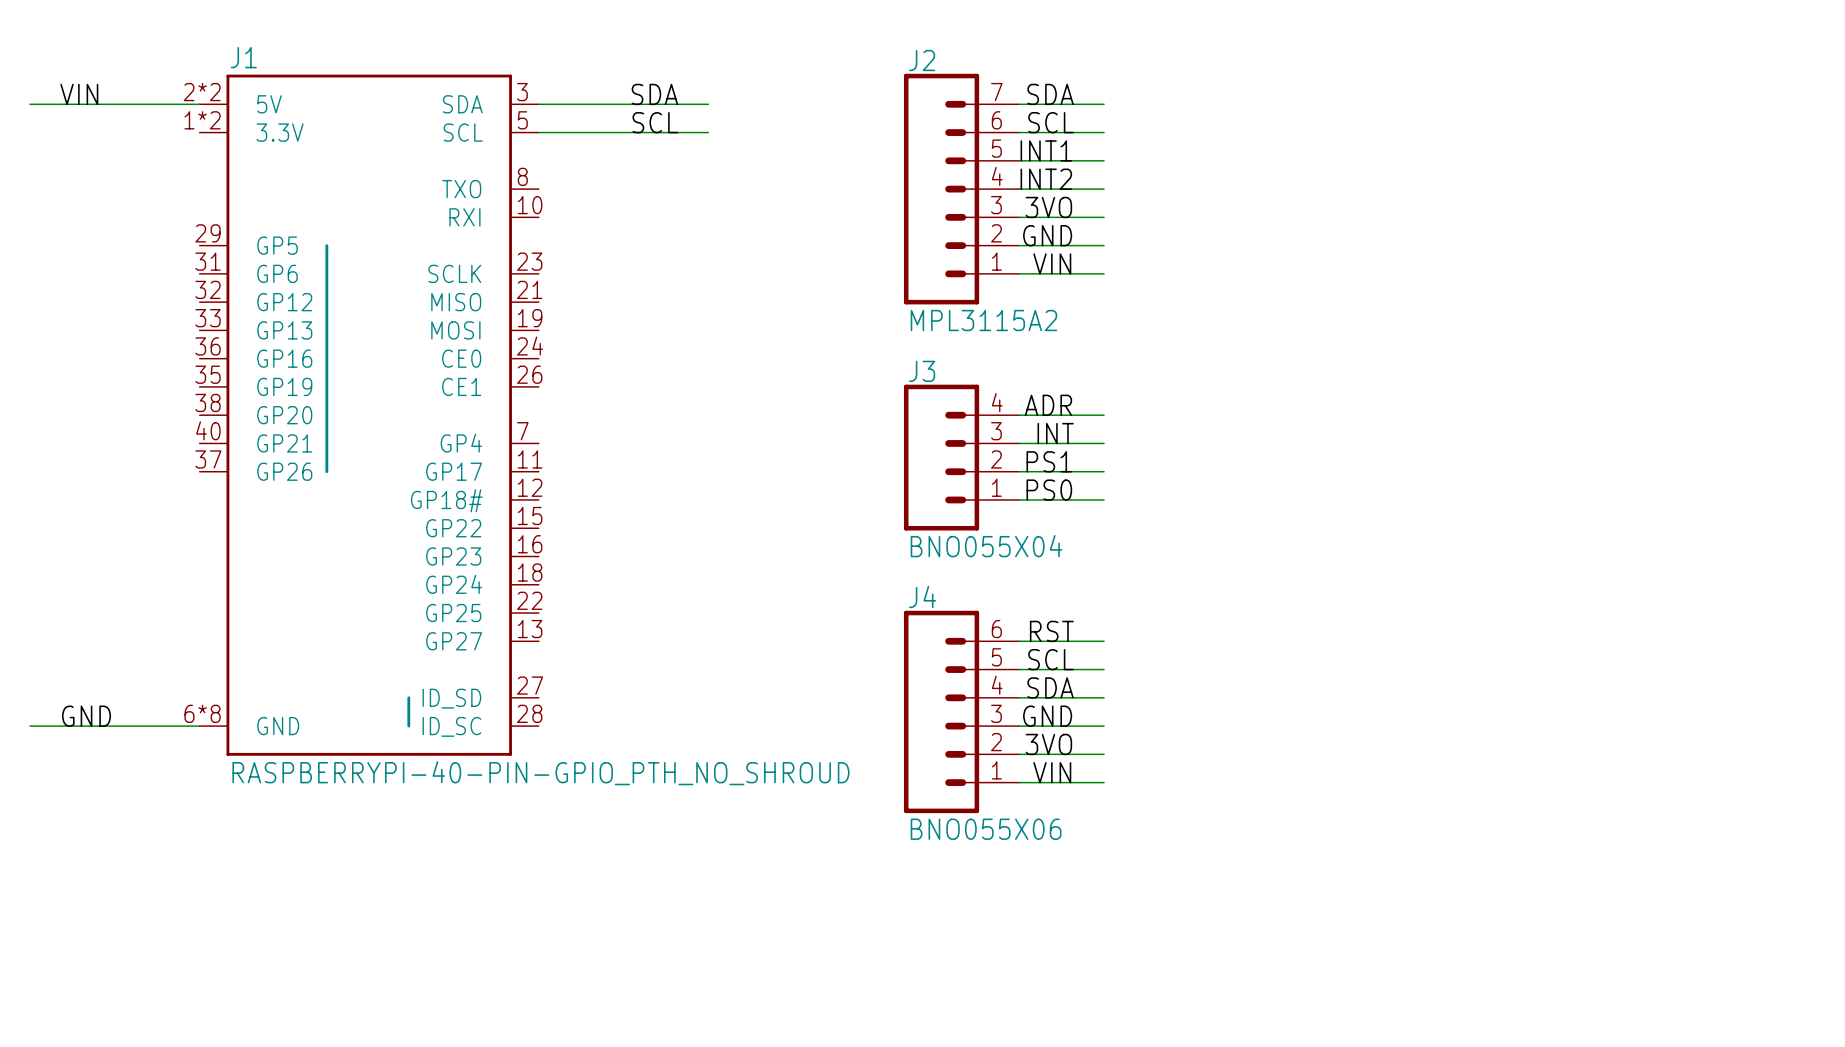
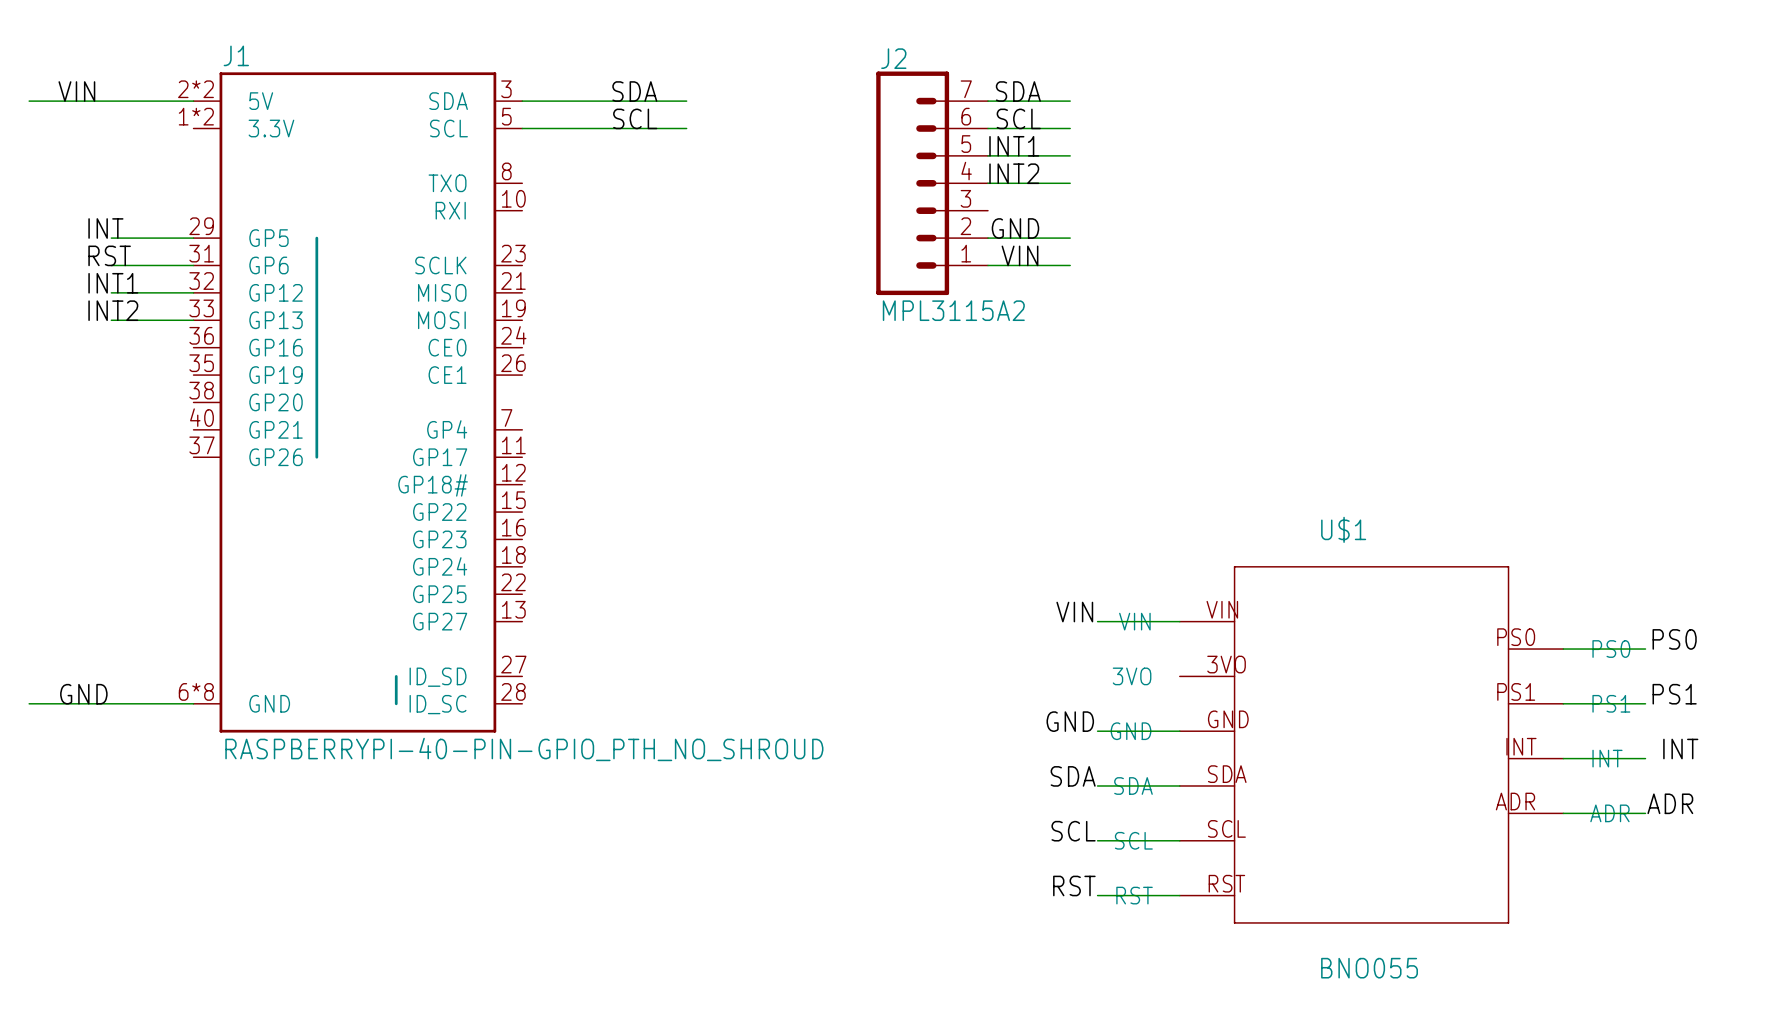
label: 3VO (1048, 207) -> none
wire: (1019, 217) (1104, 217) -> none
label: none -> INT (105, 228)
wire: none -> (111, 238) (193, 238)
label: none -> RST (109, 255)
wire: none -> (111, 265) (193, 265)
label: none -> INT1 (113, 283)
wire: none -> (111, 292) (193, 292)
label: none -> INT2 (113, 310)
wire: none -> (111, 320) (193, 320)
label: ADR (1048, 405) -> none
wire: (1019, 415) (1104, 415) -> none
label: INT (1055, 433) -> none
wire: (1019, 443) (1104, 443) -> none
J3: (961, 457) -> none
label: PS1 (1049, 461) -> none
wire: (1019, 471) (1104, 471) -> none
label: PS0 (1049, 490) -> none
wire: (1019, 499) (1104, 499) -> (1097, 621) (1179, 621)
label: RST (1051, 631) -> none
wire: (1019, 641) (1104, 641) -> (1097, 731) (1179, 731)
label position: SCL (1051, 659) -> SCL (1073, 831)
label: none -> PS0 (1674, 639)
wire: (1019, 669) (1104, 669) -> (1097, 785) (1179, 785)
wire: none -> (1563, 649) (1645, 649)
label position: SDA (1050, 687) -> SDA (1073, 776)
wire: (1019, 697) (1104, 697) -> none
J4: (961, 711) -> none
label position: GND (1047, 716) -> GND (1070, 721)
label: none -> PS1 (1674, 694)
wire: (1019, 726) (1104, 726) -> (1097, 840) (1179, 840)
wire: none -> (1563, 703) (1645, 703)
label: 3VO (1048, 744) -> none
wire: (1019, 754) (1104, 754) -> none
U$1: none -> BNO055 (1371, 744)
label position: VIN (1052, 772) -> VIN (1074, 612)
label: none -> INT (1680, 749)
wire: (1019, 782) (1104, 782) -> (1097, 895) (1179, 895)
wire: none -> (1563, 758) (1645, 758)
label: none -> ADR (1670, 803)
wire: none -> (1563, 813) (1645, 813)
label: none -> RST (1074, 885)

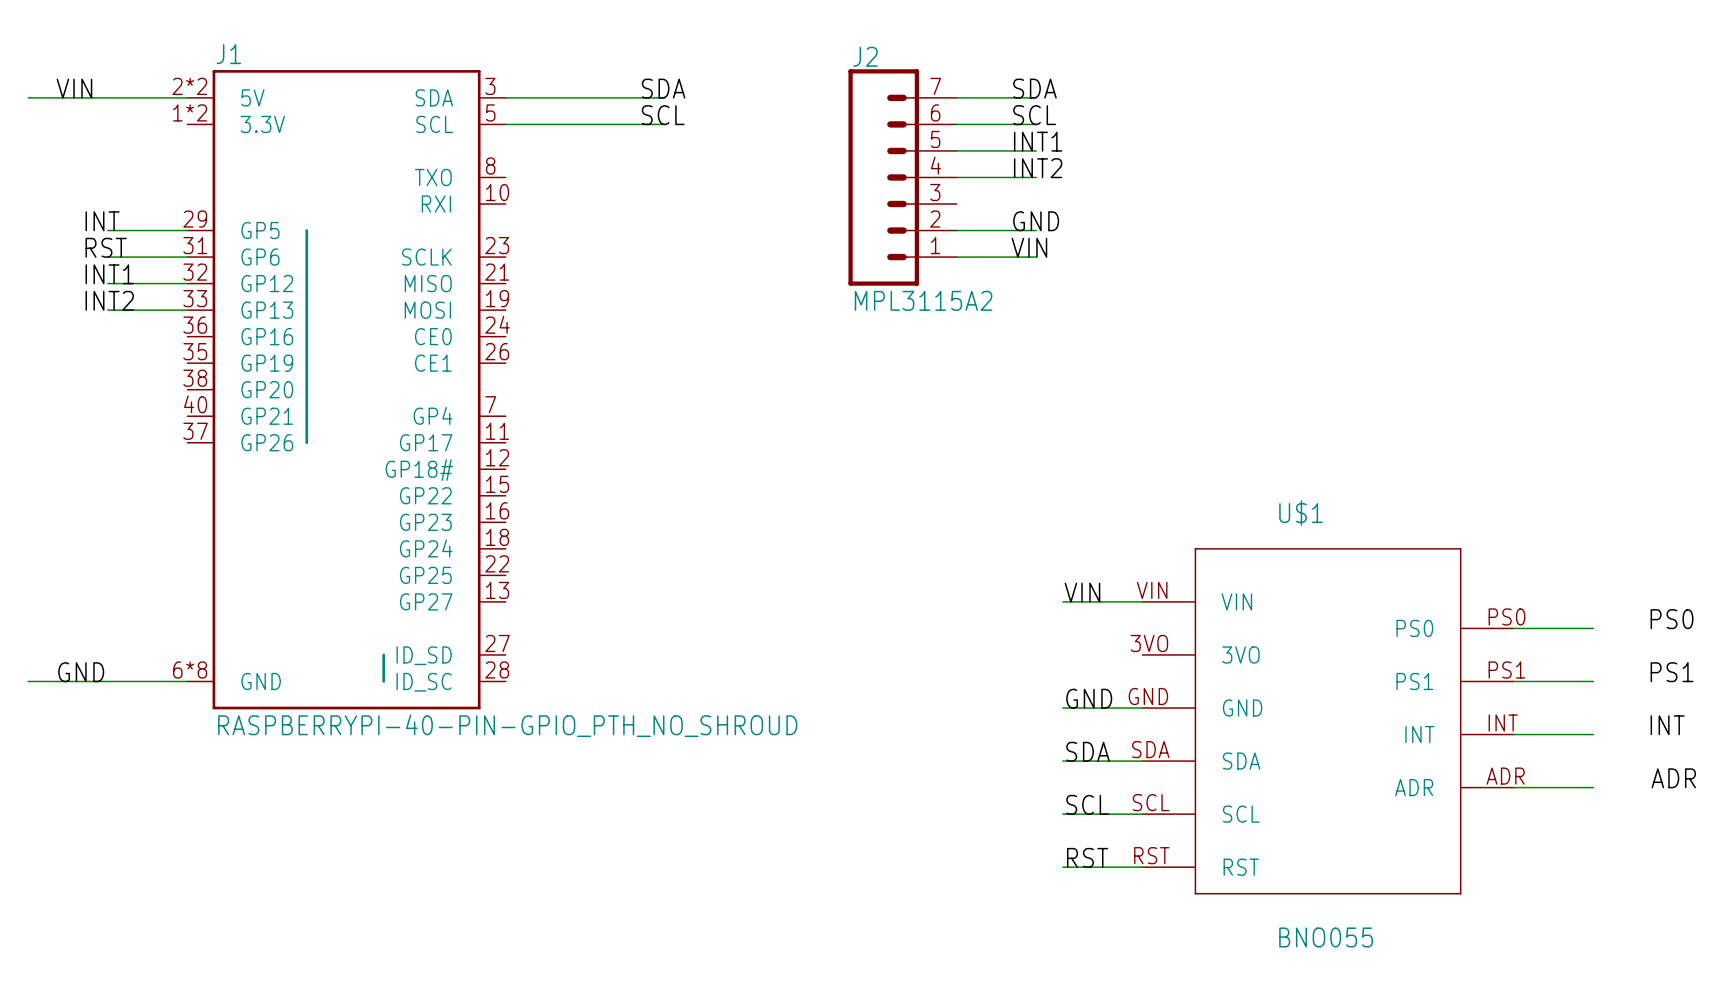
label position: SDA (634, 91) -> SDA (663, 88)
label position: SDA (1018, 91) -> SDA (1034, 88)
label position: SCL (635, 118) -> SCL (663, 115)
label position: SCL (1018, 118) -> SCL (1034, 115)
label position: INT1 (1014, 146) -> INT1 (1038, 141)
label position: INT2 (1014, 173) -> INT2 (1038, 168)
label position: GND (1015, 228) -> GND (1036, 221)
label position: VIN (1020, 255) -> VIN (1029, 247)
U$1 symbol: [1179, 566, 1564, 924] -> [1142, 548, 1514, 894]
label position: VIN (1074, 612) -> VIN (1082, 592)
label position: PS0 (1674, 639) -> PS0 (1672, 619)
label position: PS1 (1674, 694) -> PS1 (1672, 672)
label position: GND (1070, 721) -> GND (1089, 698)
label position: INT (1680, 749) -> INT (1667, 725)
label position: SDA (1073, 776) -> SDA (1088, 751)
label position: ADR (1670, 803) -> ADR (1673, 778)
label position: SCL (1073, 831) -> SCL (1087, 804)
label position: RST (1074, 885) -> RST (1087, 857)

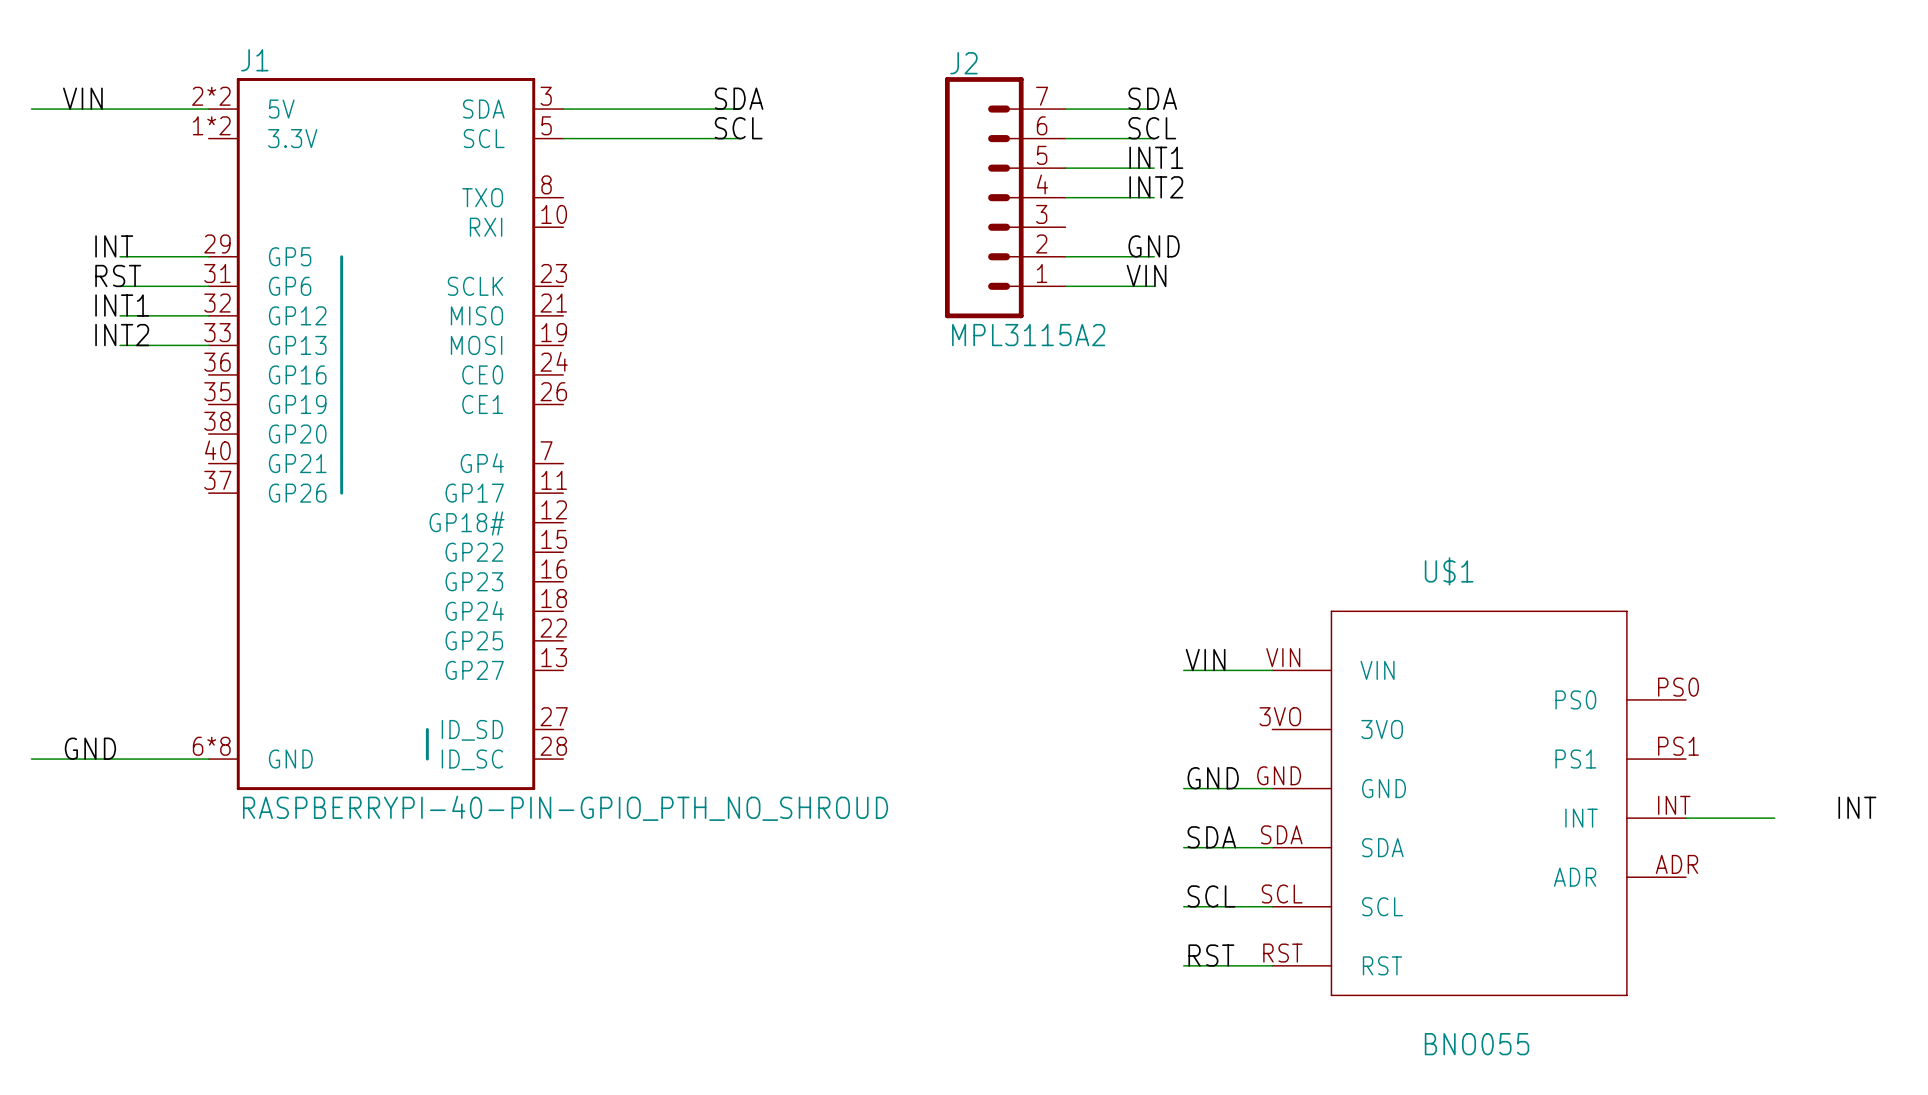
label: PS0 (1672, 619) -> none
wire: (1513, 628) (1593, 628) -> none
label: PS1 (1672, 672) -> none
wire: (1513, 681) (1593, 681) -> none
label: ADR (1673, 778) -> none
wire: (1513, 787) (1593, 787) -> none

